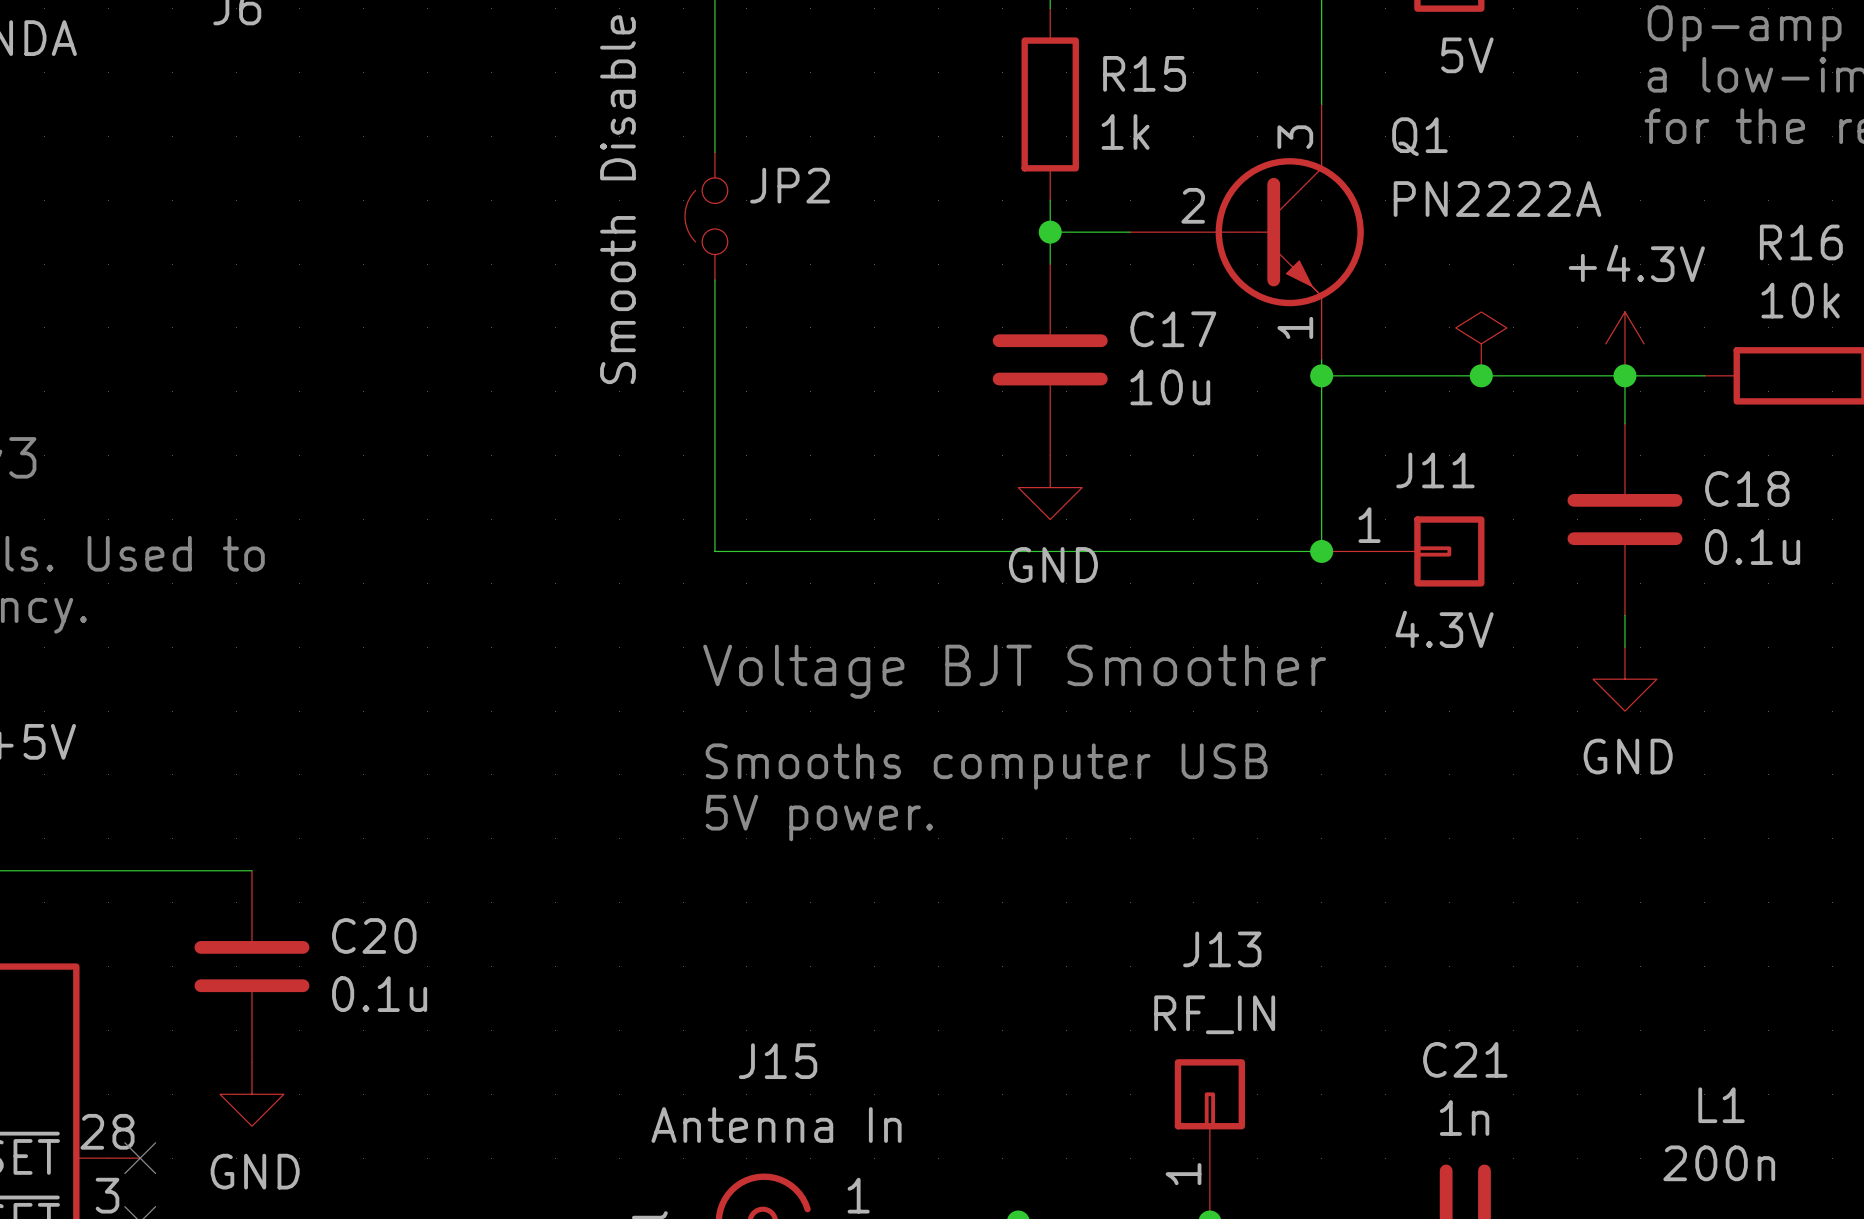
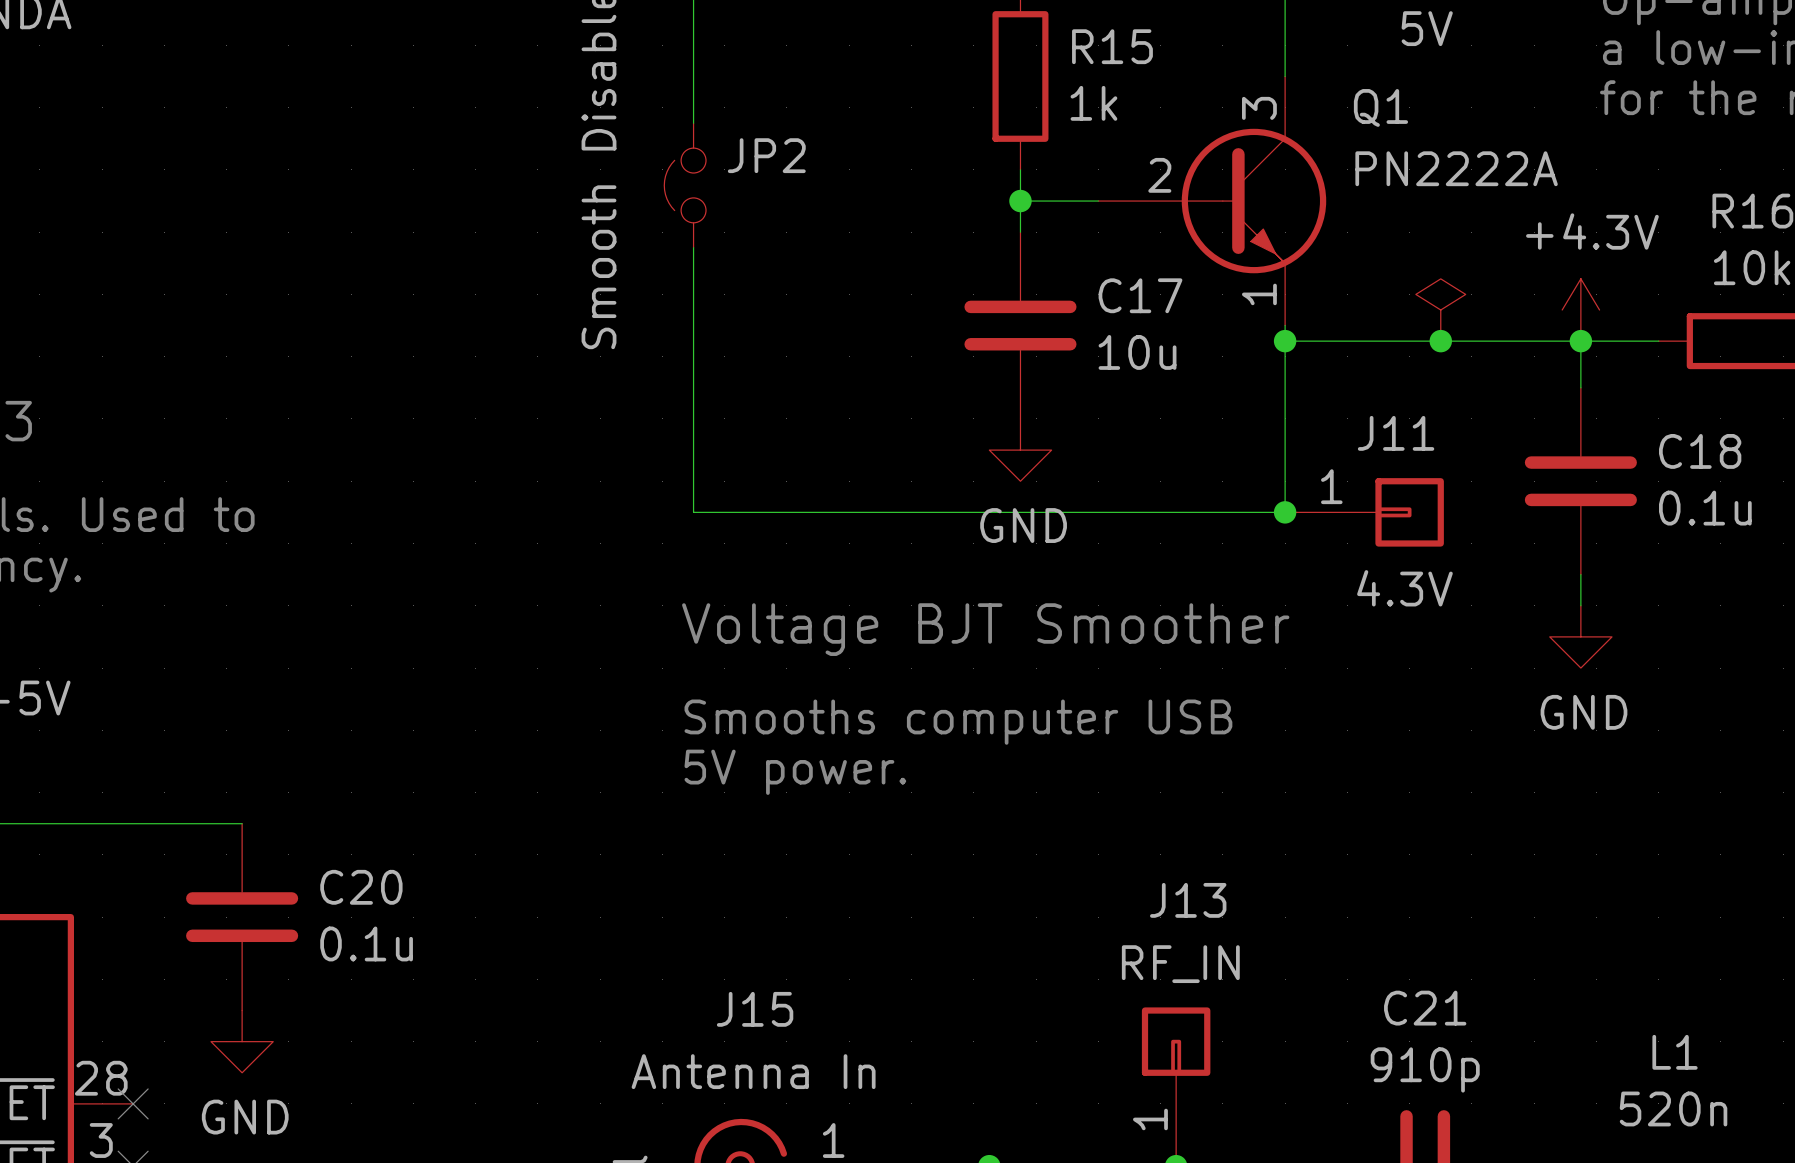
C21 value: 1n (1464, 1117) -> 910p (1425, 1069)
L1 value: 200n (1719, 1163) -> 520n (1673, 1108)

